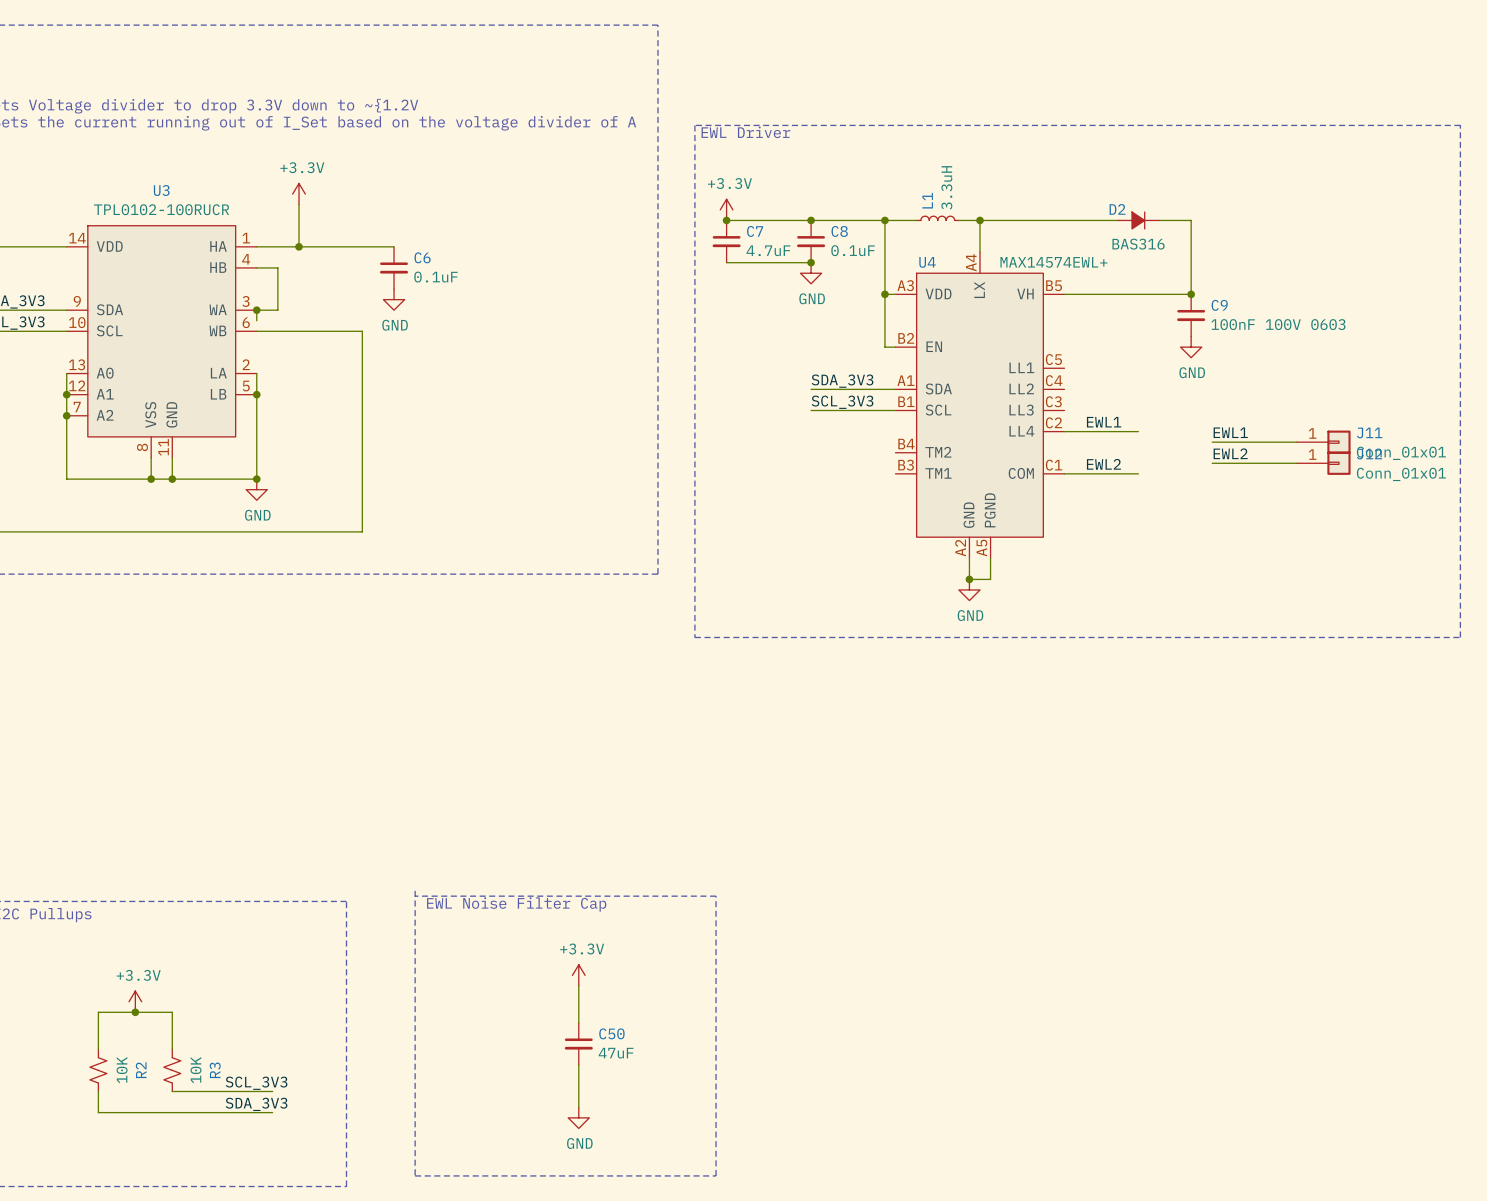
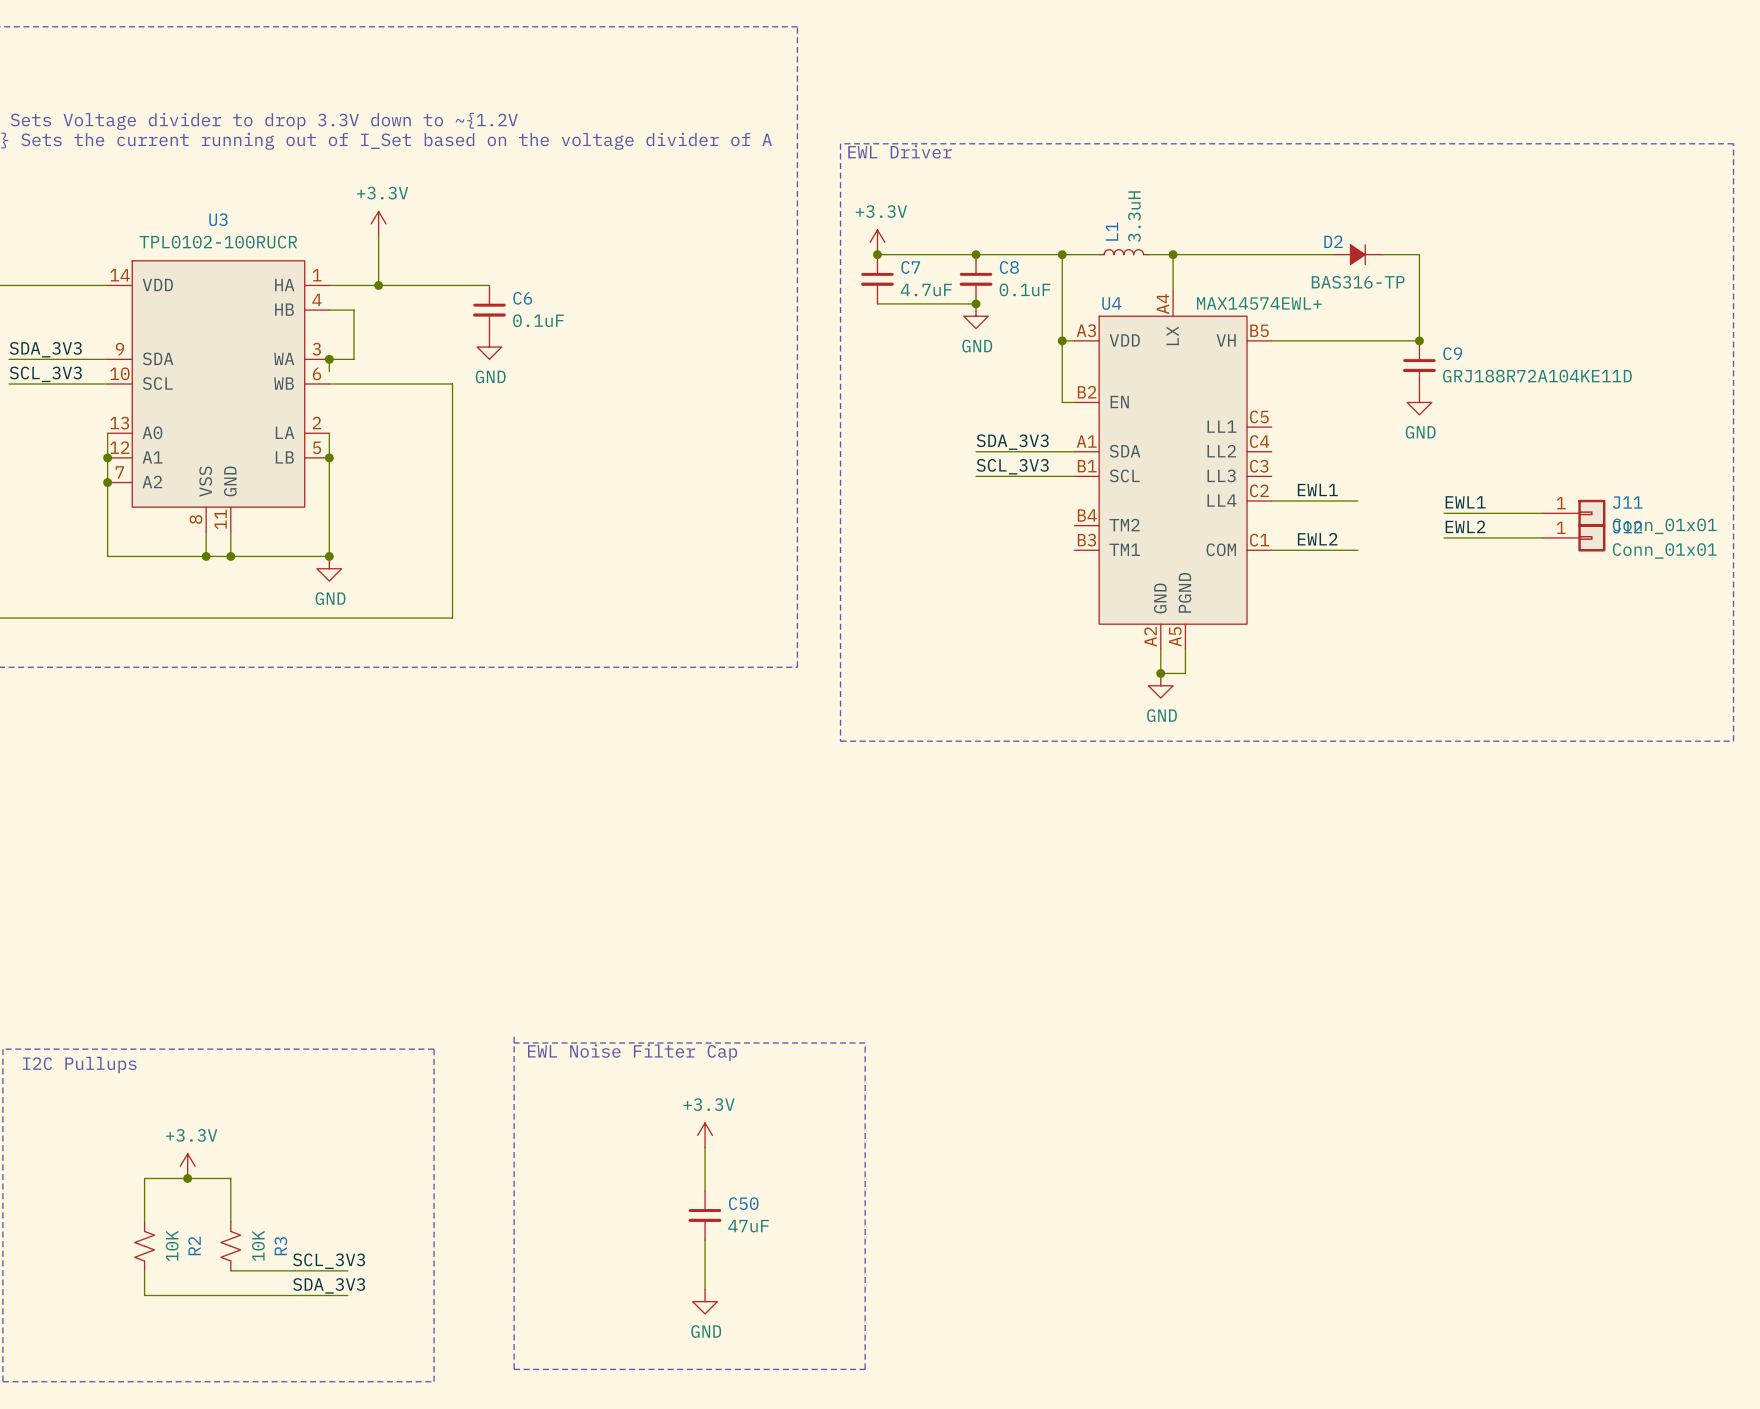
D2 value: BAS316 (1138, 244) -> BAS316-TP (1358, 282)
C9 value: 100nF 100V 0603 (1278, 324) -> GRJ188R72A104KE11D (1537, 376)

